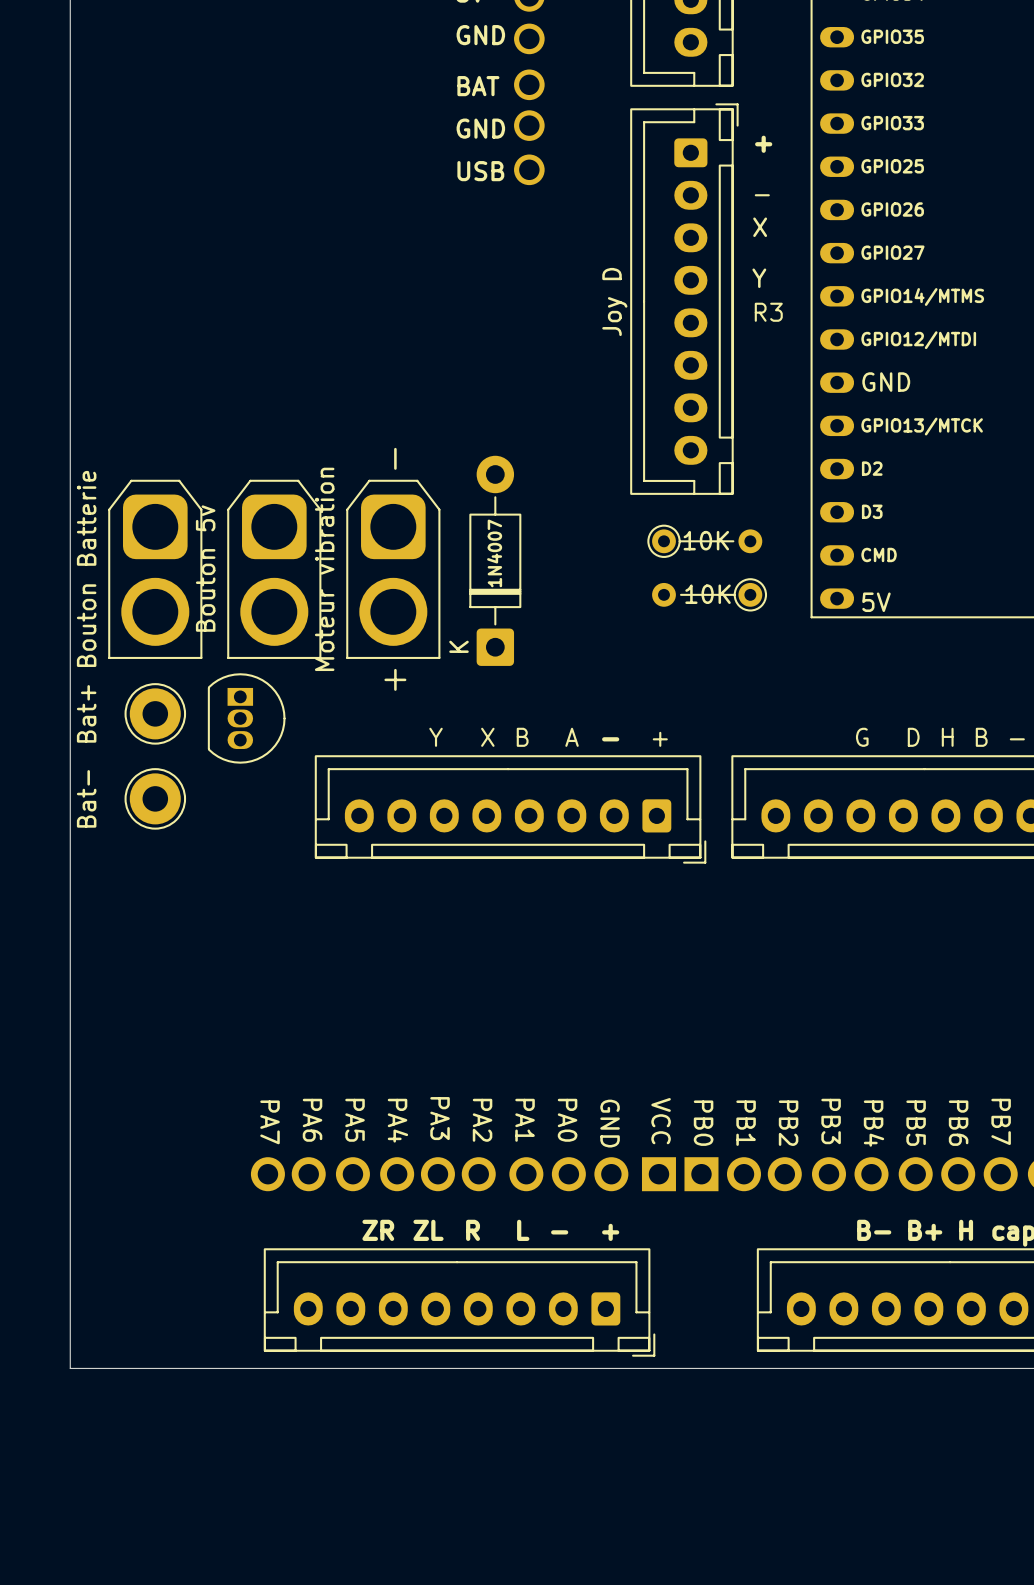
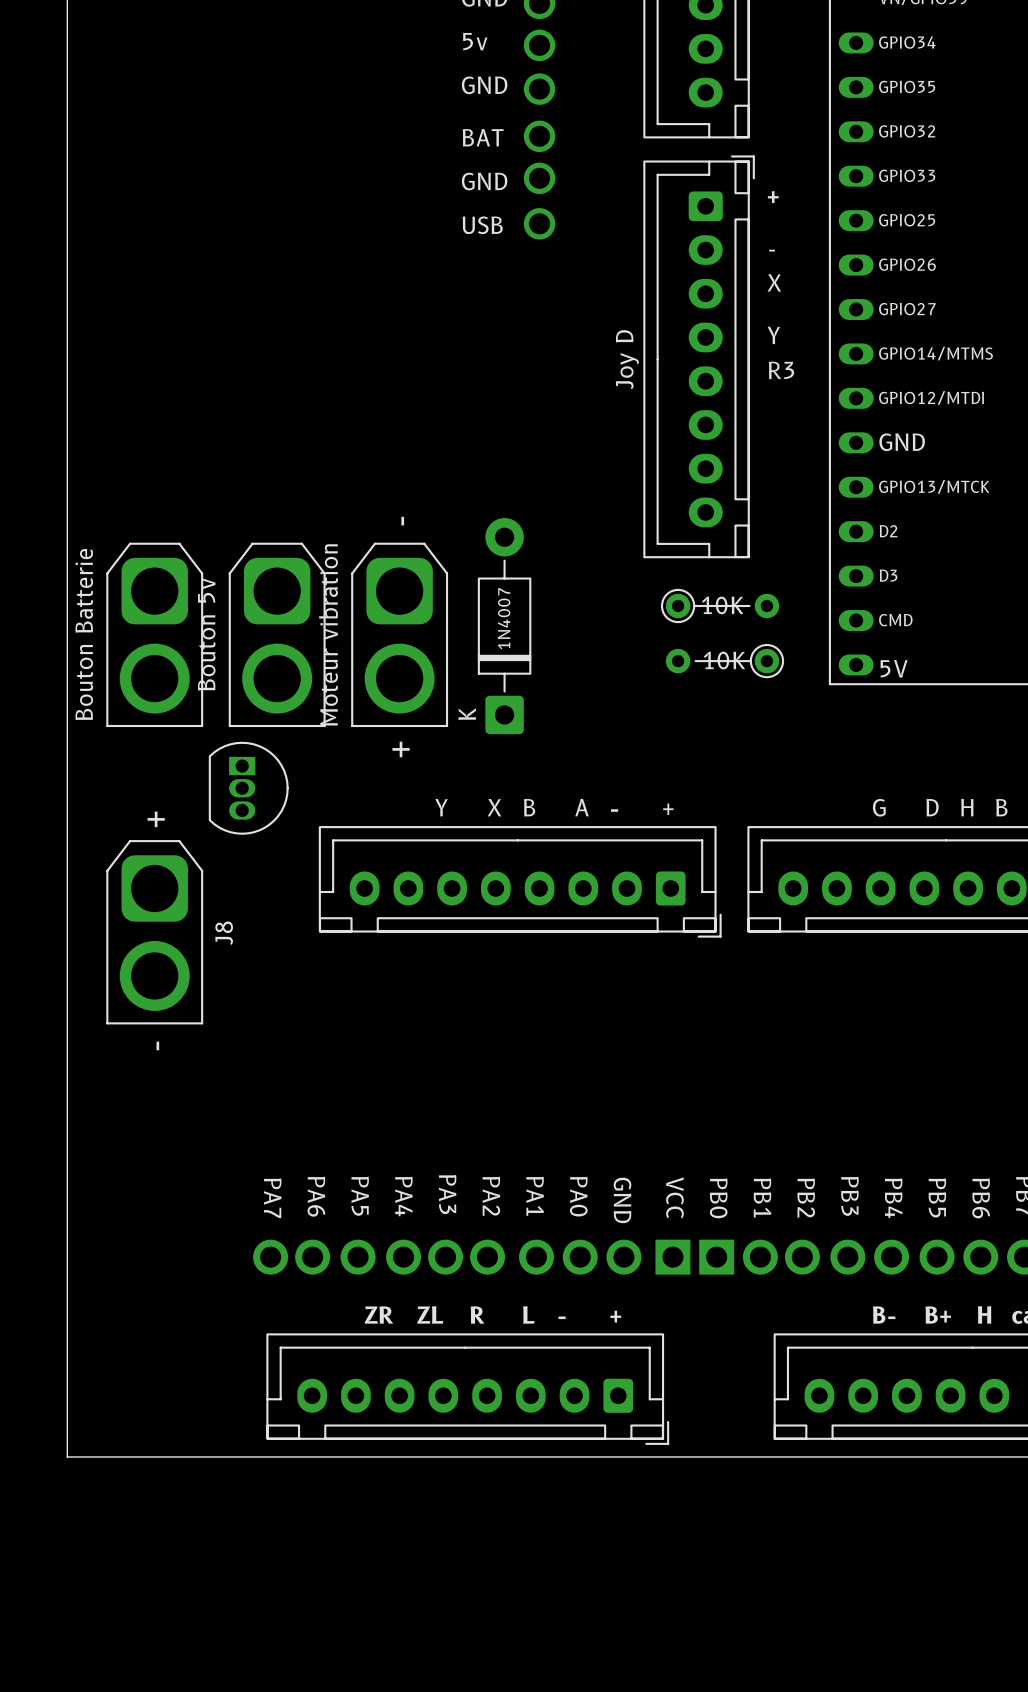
Bat+: (155, 713) -> none
Bat-: (155, 798) -> none
J8: none -> (154, 932)

